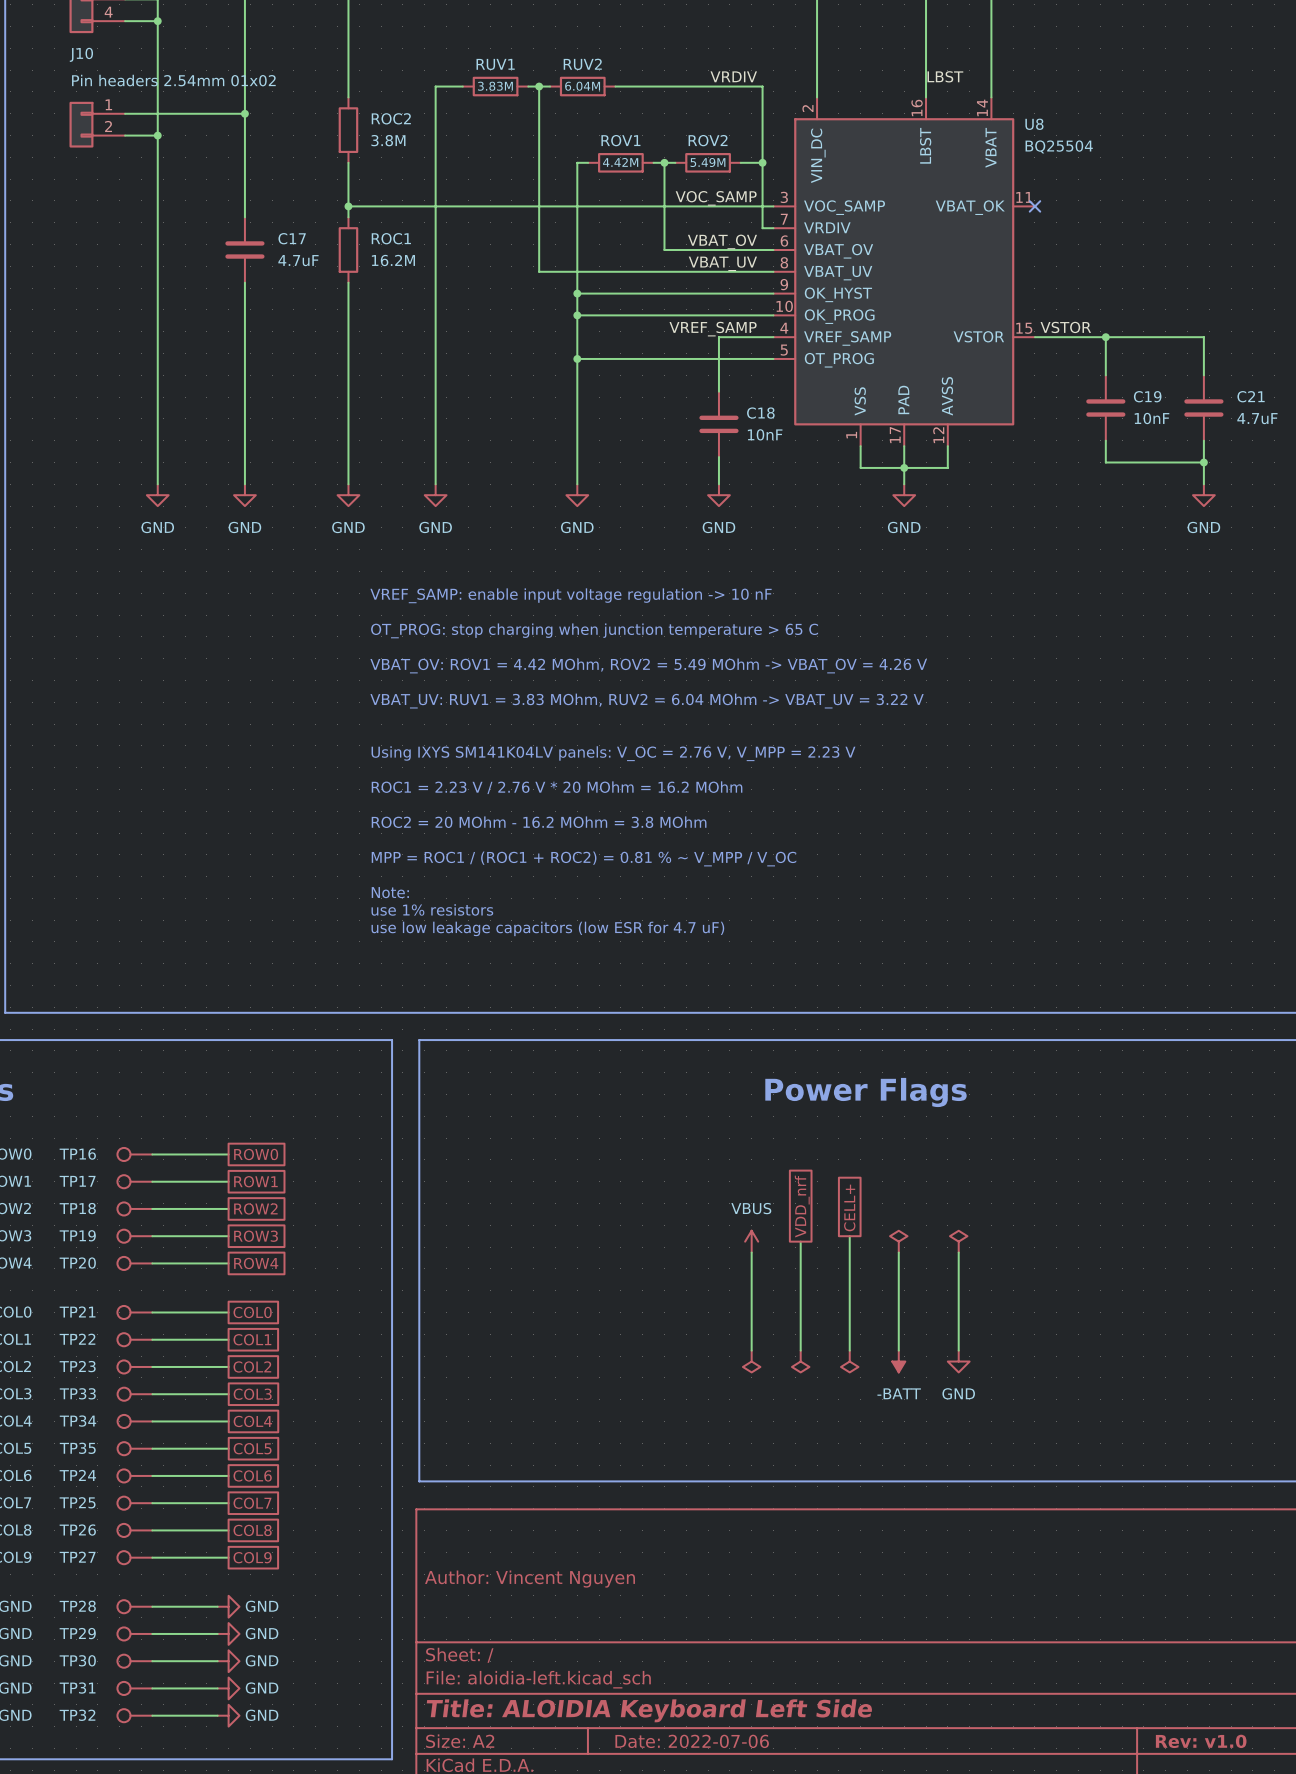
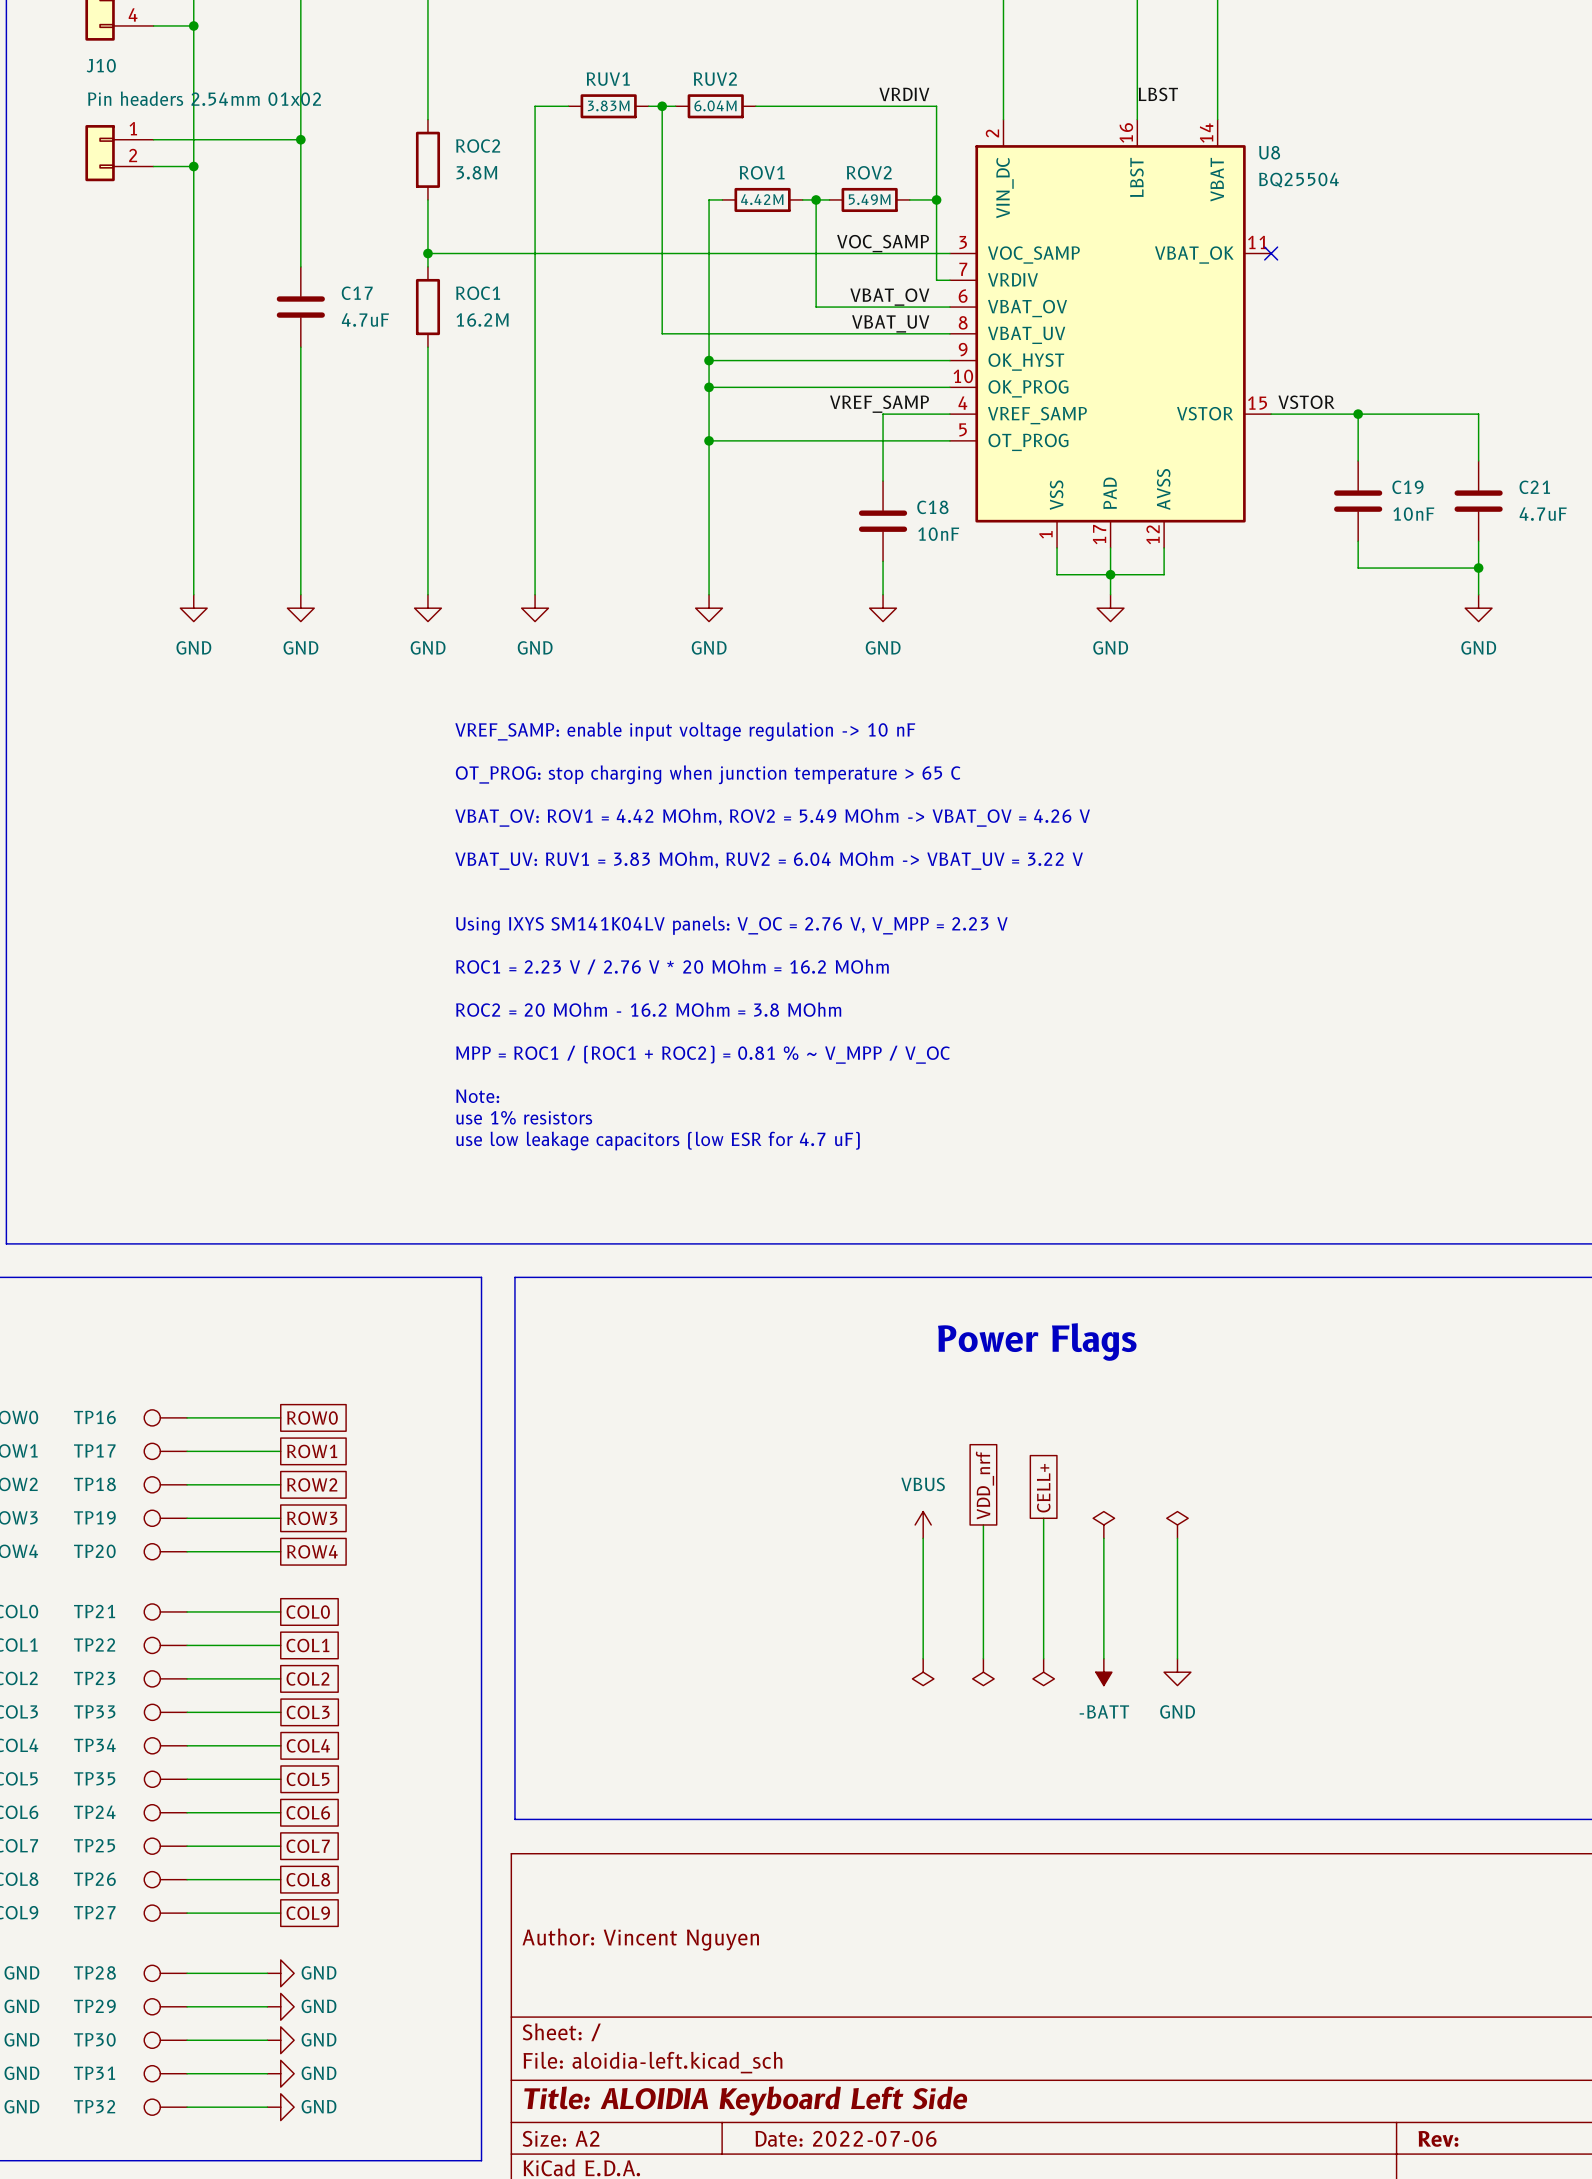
title block: Rev: v1.0 (1201, 1741) -> Rev: (1438, 2138)

